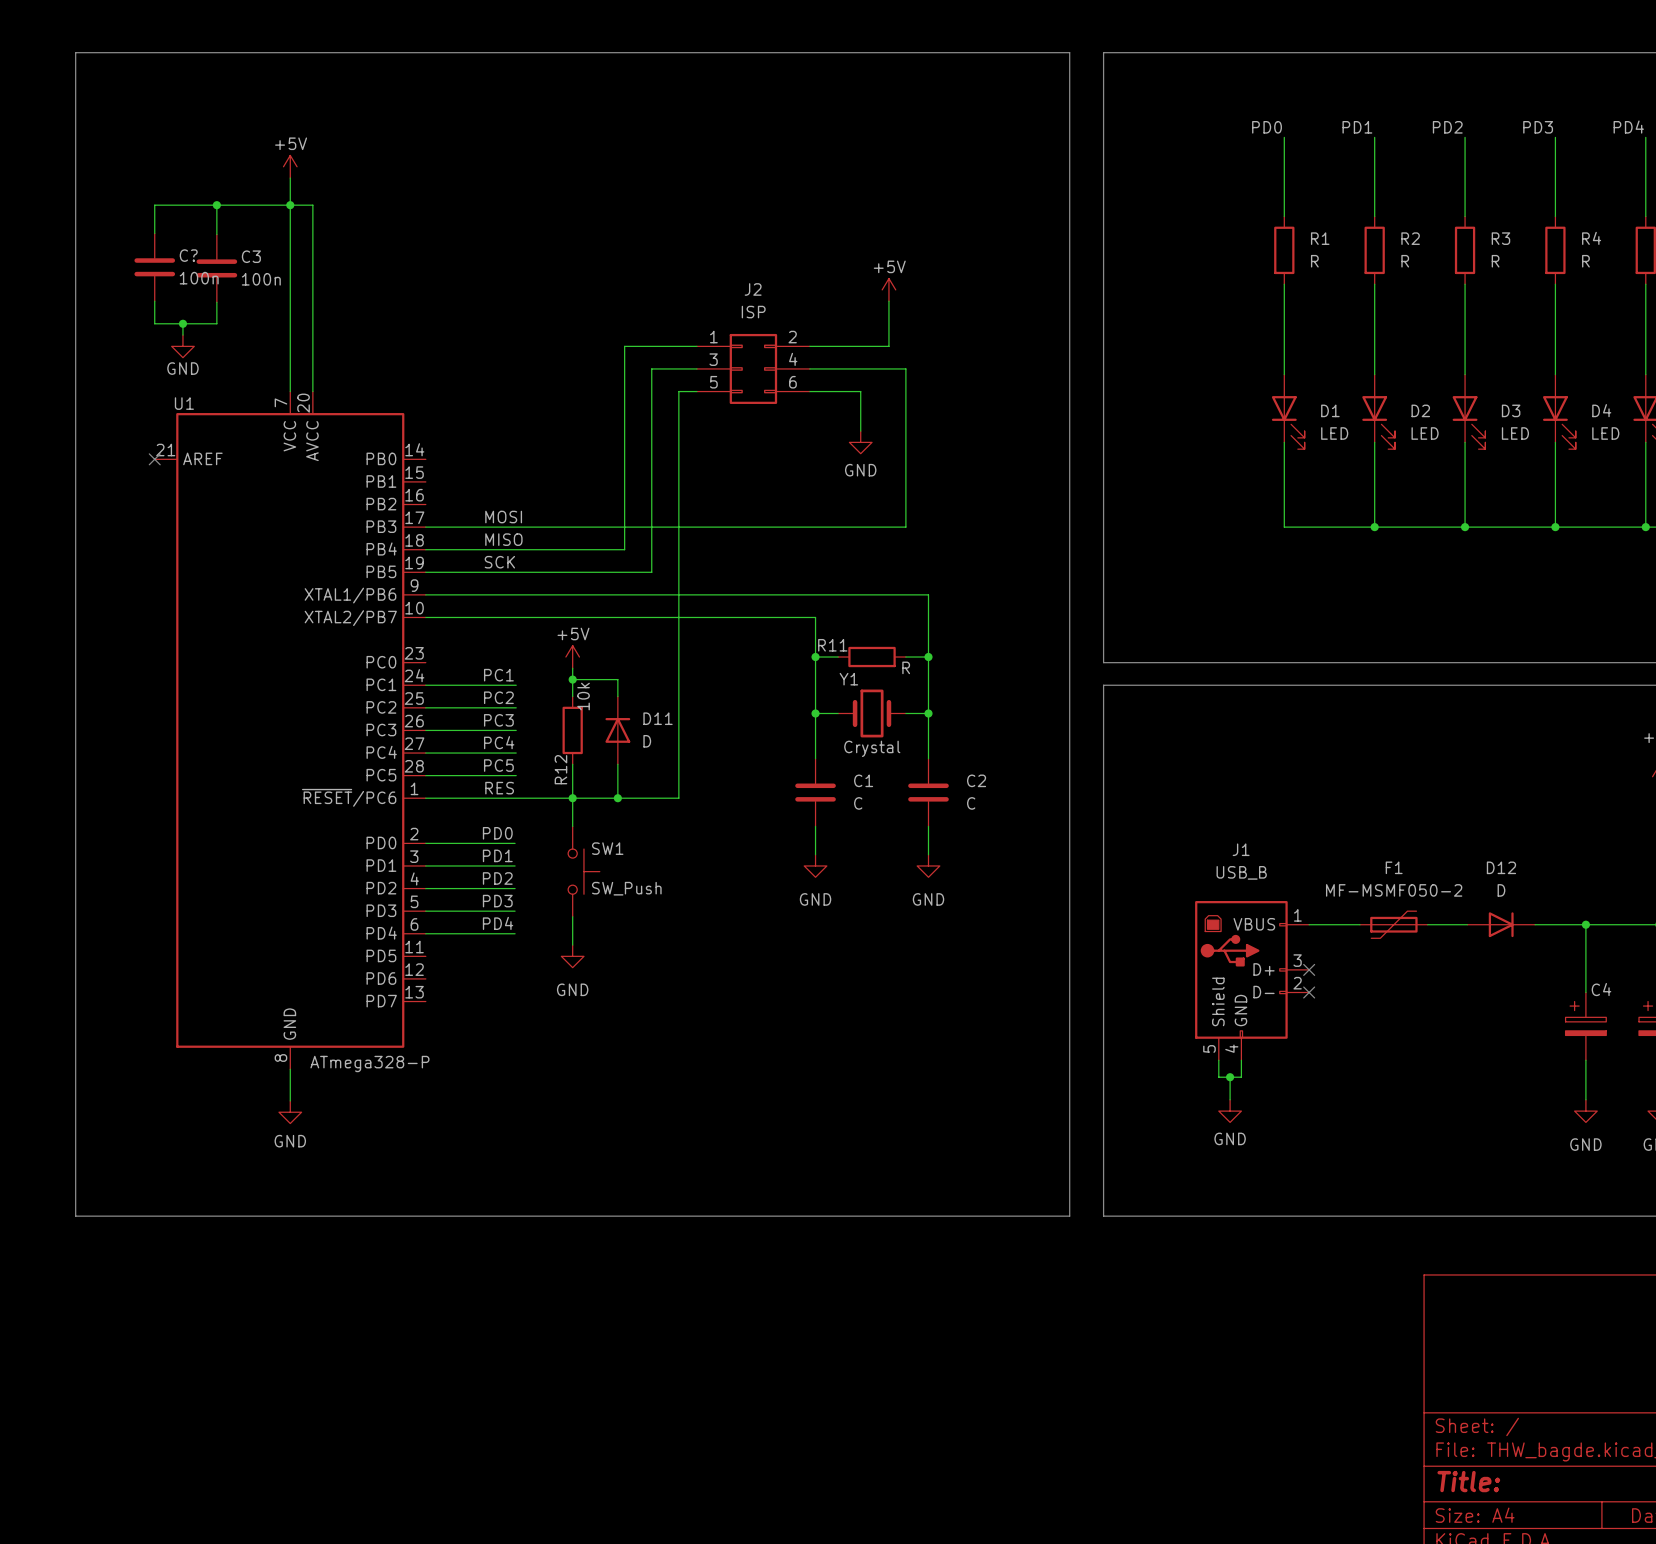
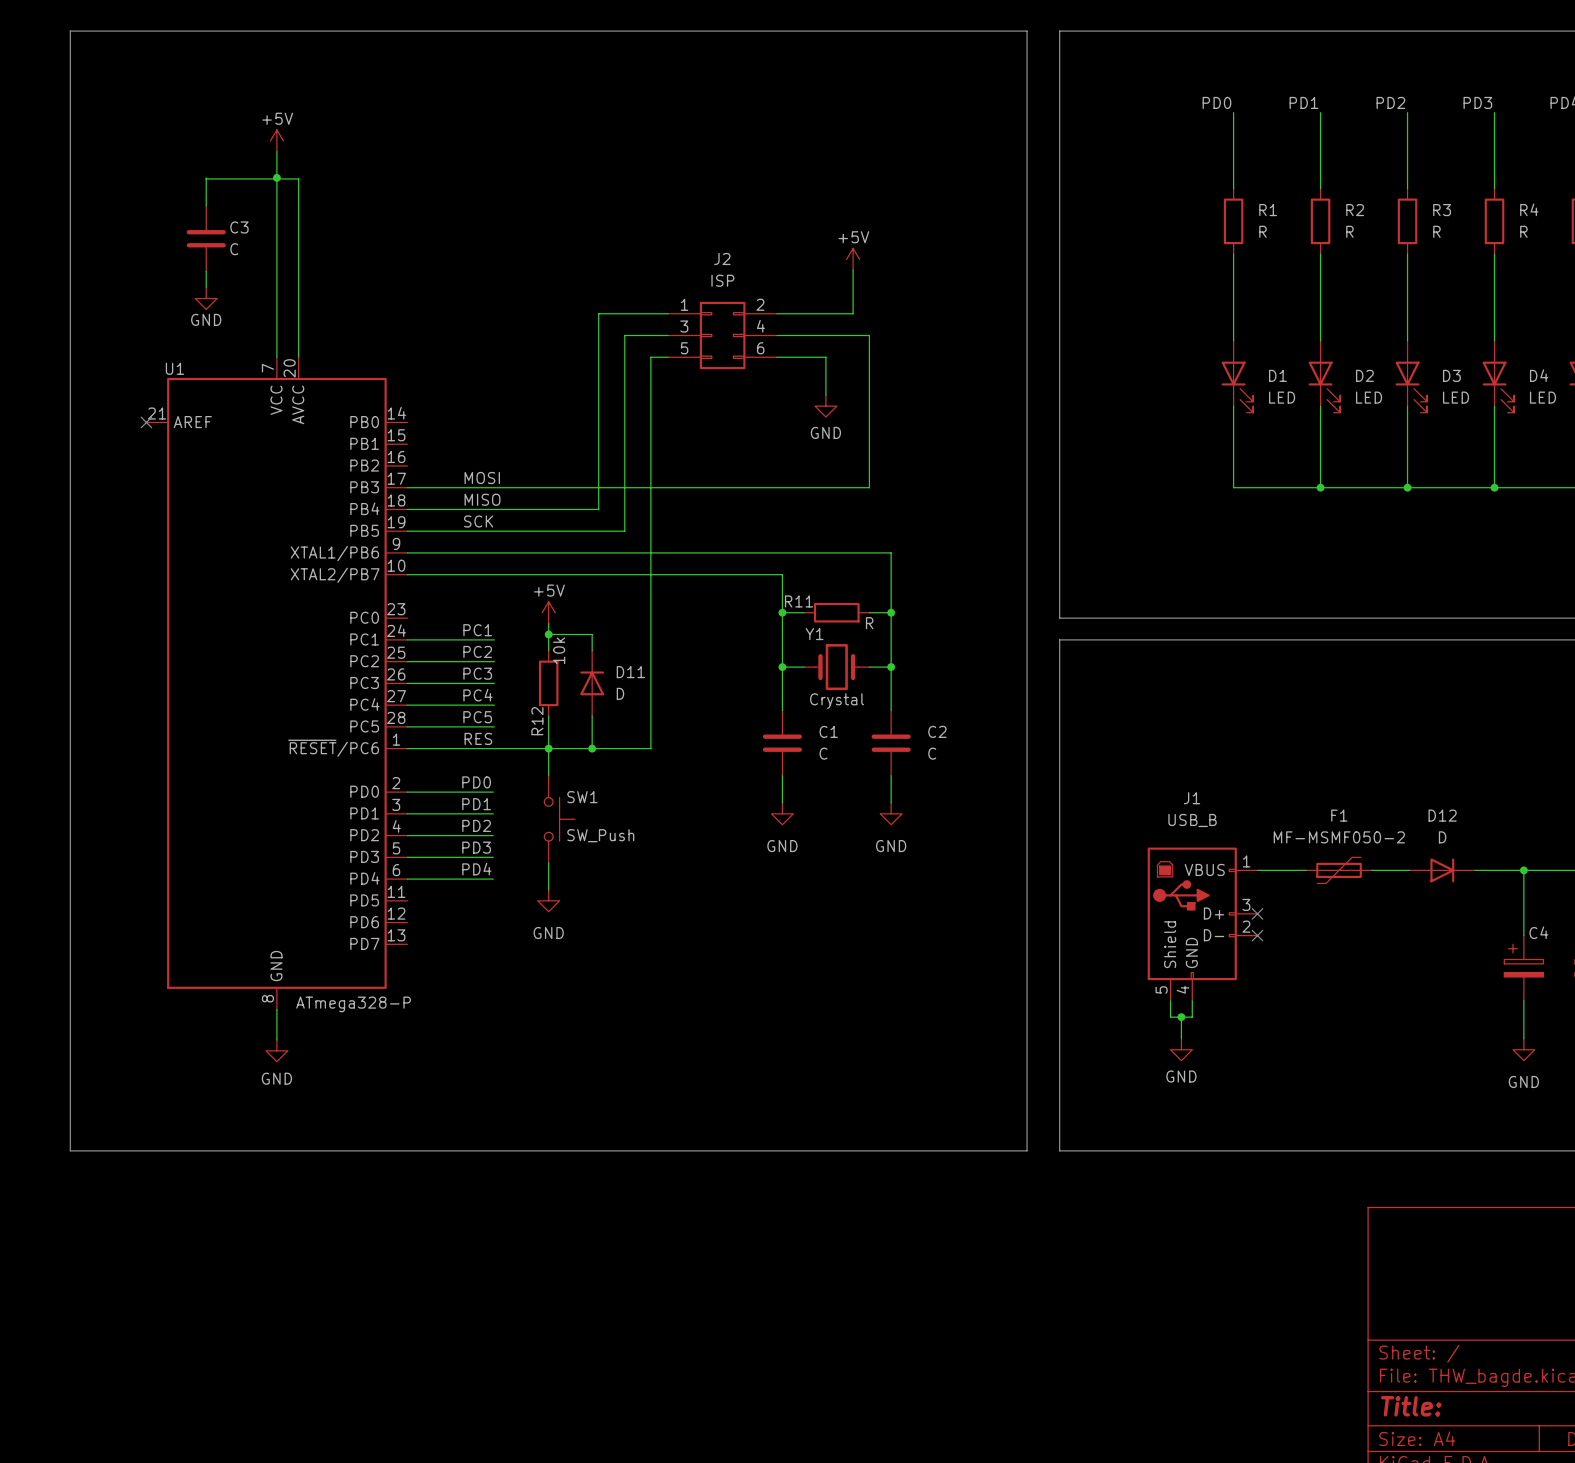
junction: (216, 205) -> none
wire: (312, 206) (154, 205) (154, 233) -> (298, 178) (206, 178)
C?: 100n (154, 267) -> none
C3 value: 100n (261, 279) -> C (234, 249)
wire: (154, 301) (154, 323) (216, 323) (216, 319) -> none
wire: (182, 323) (182, 335) -> none
junction: (182, 323) -> none
power symbol position: GND (182, 346) -> GND (206, 298)

